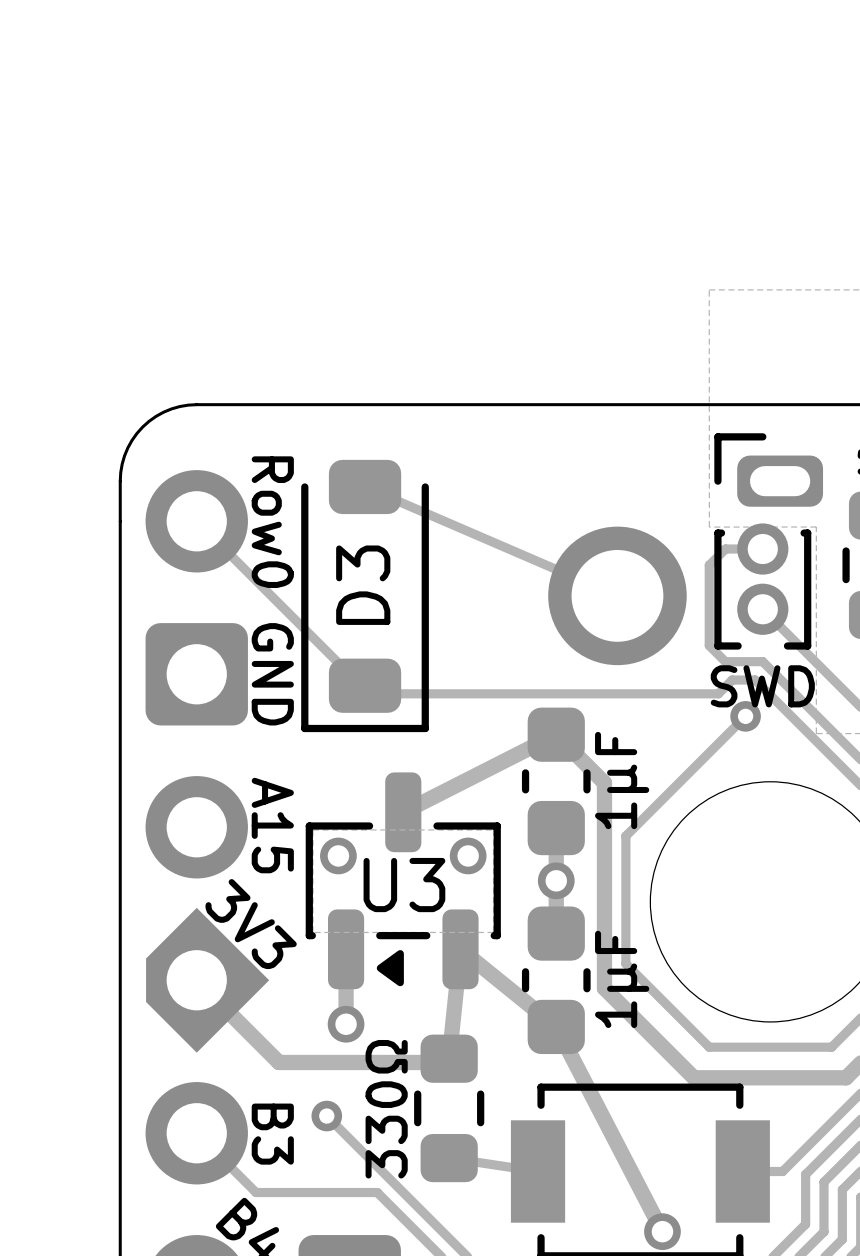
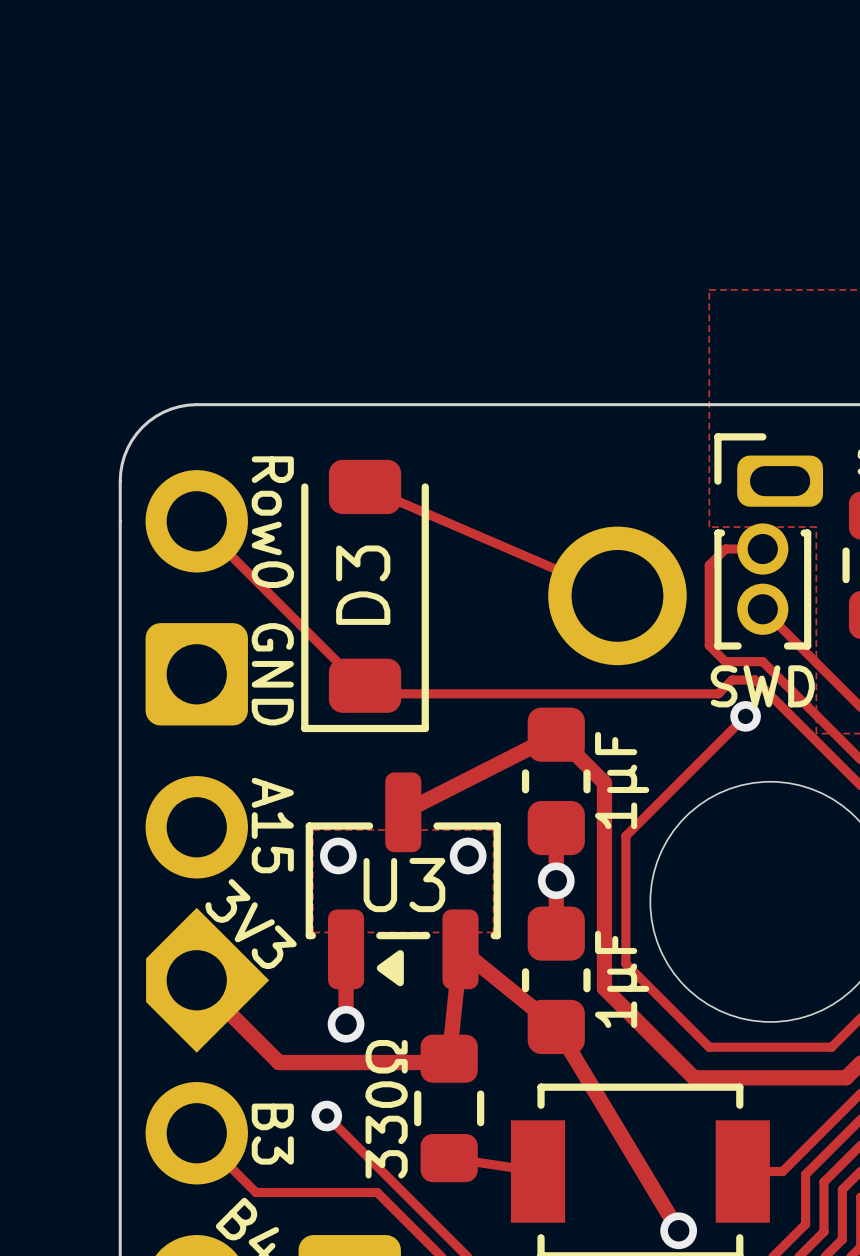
track: (556, 1026) (662, 1231) -> (556, 1026) (678, 1230)
via position: (662, 1231) -> (678, 1230)

